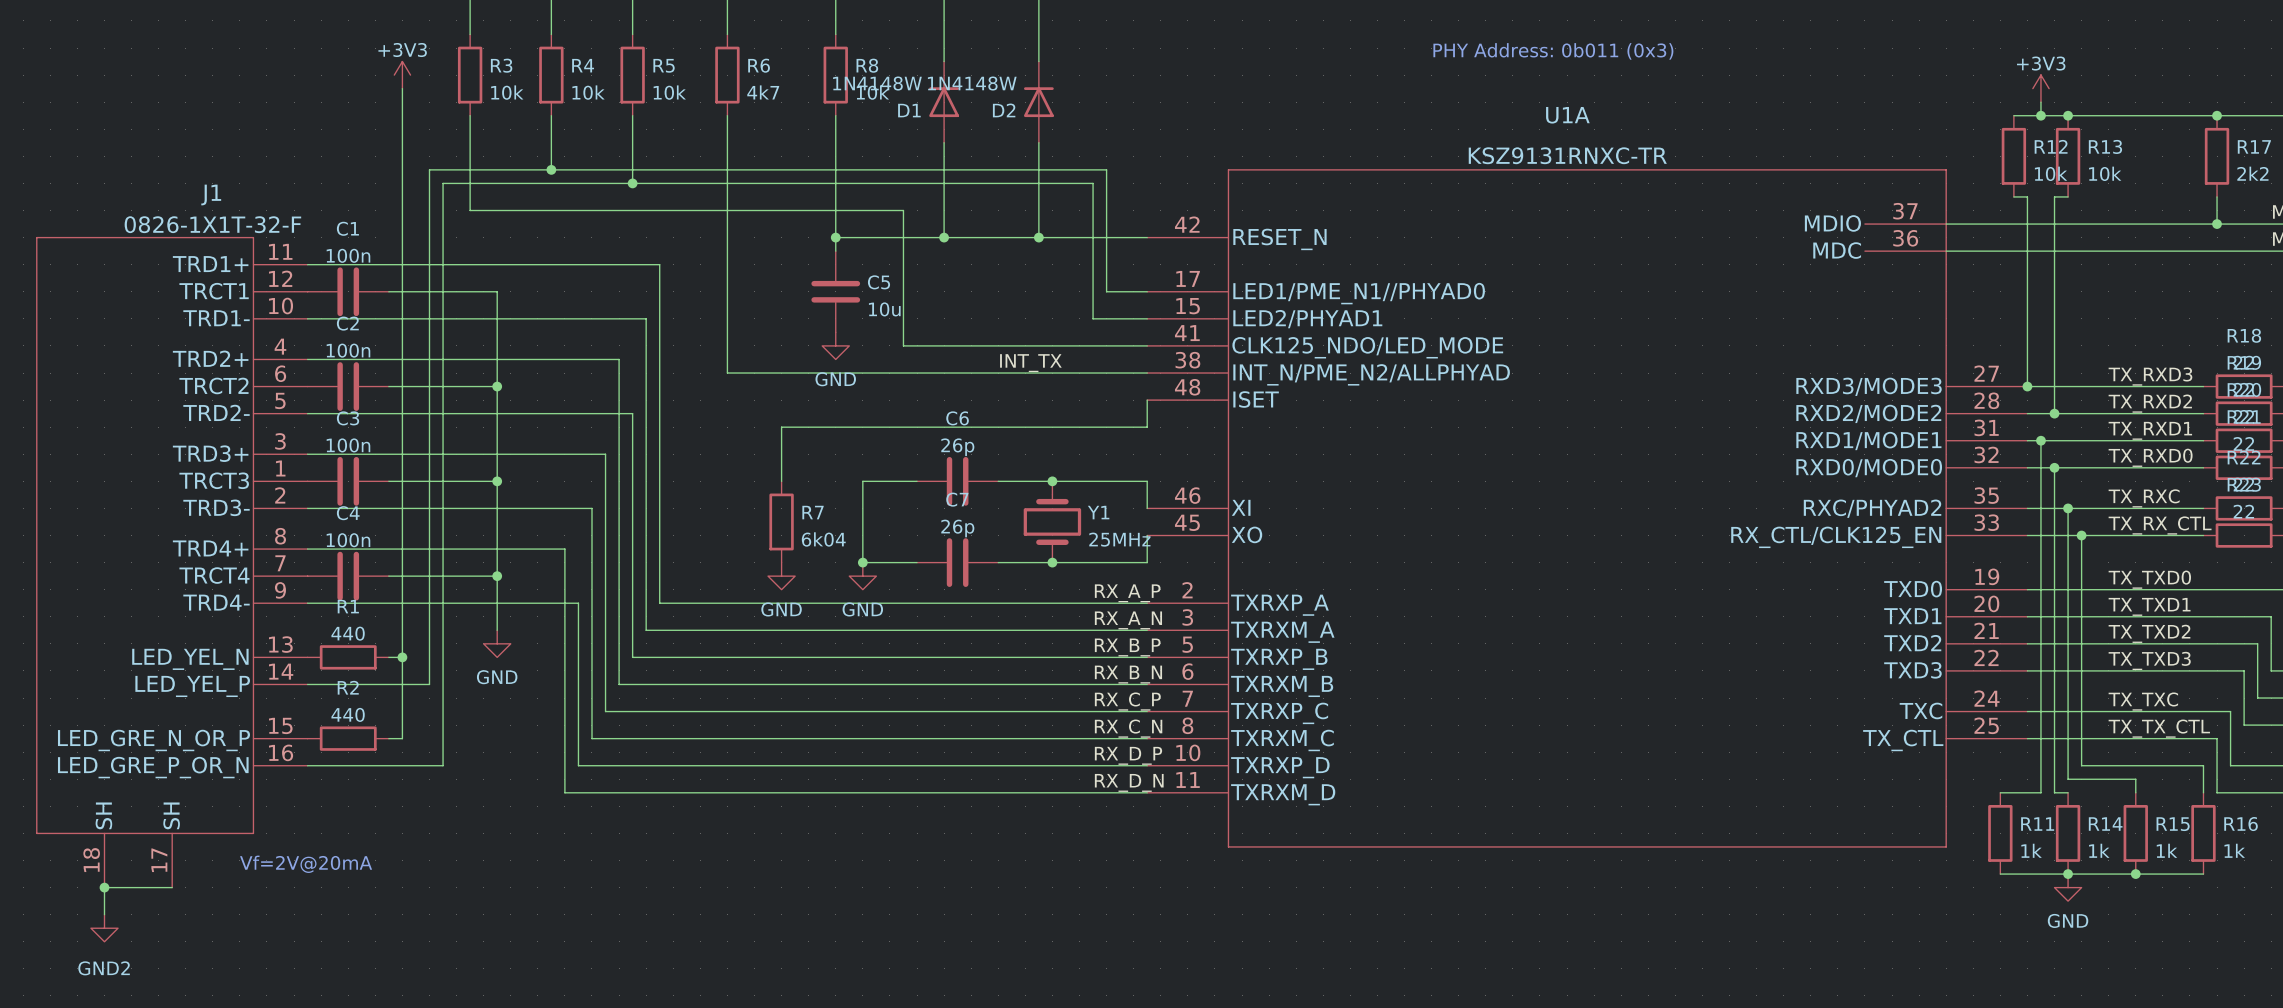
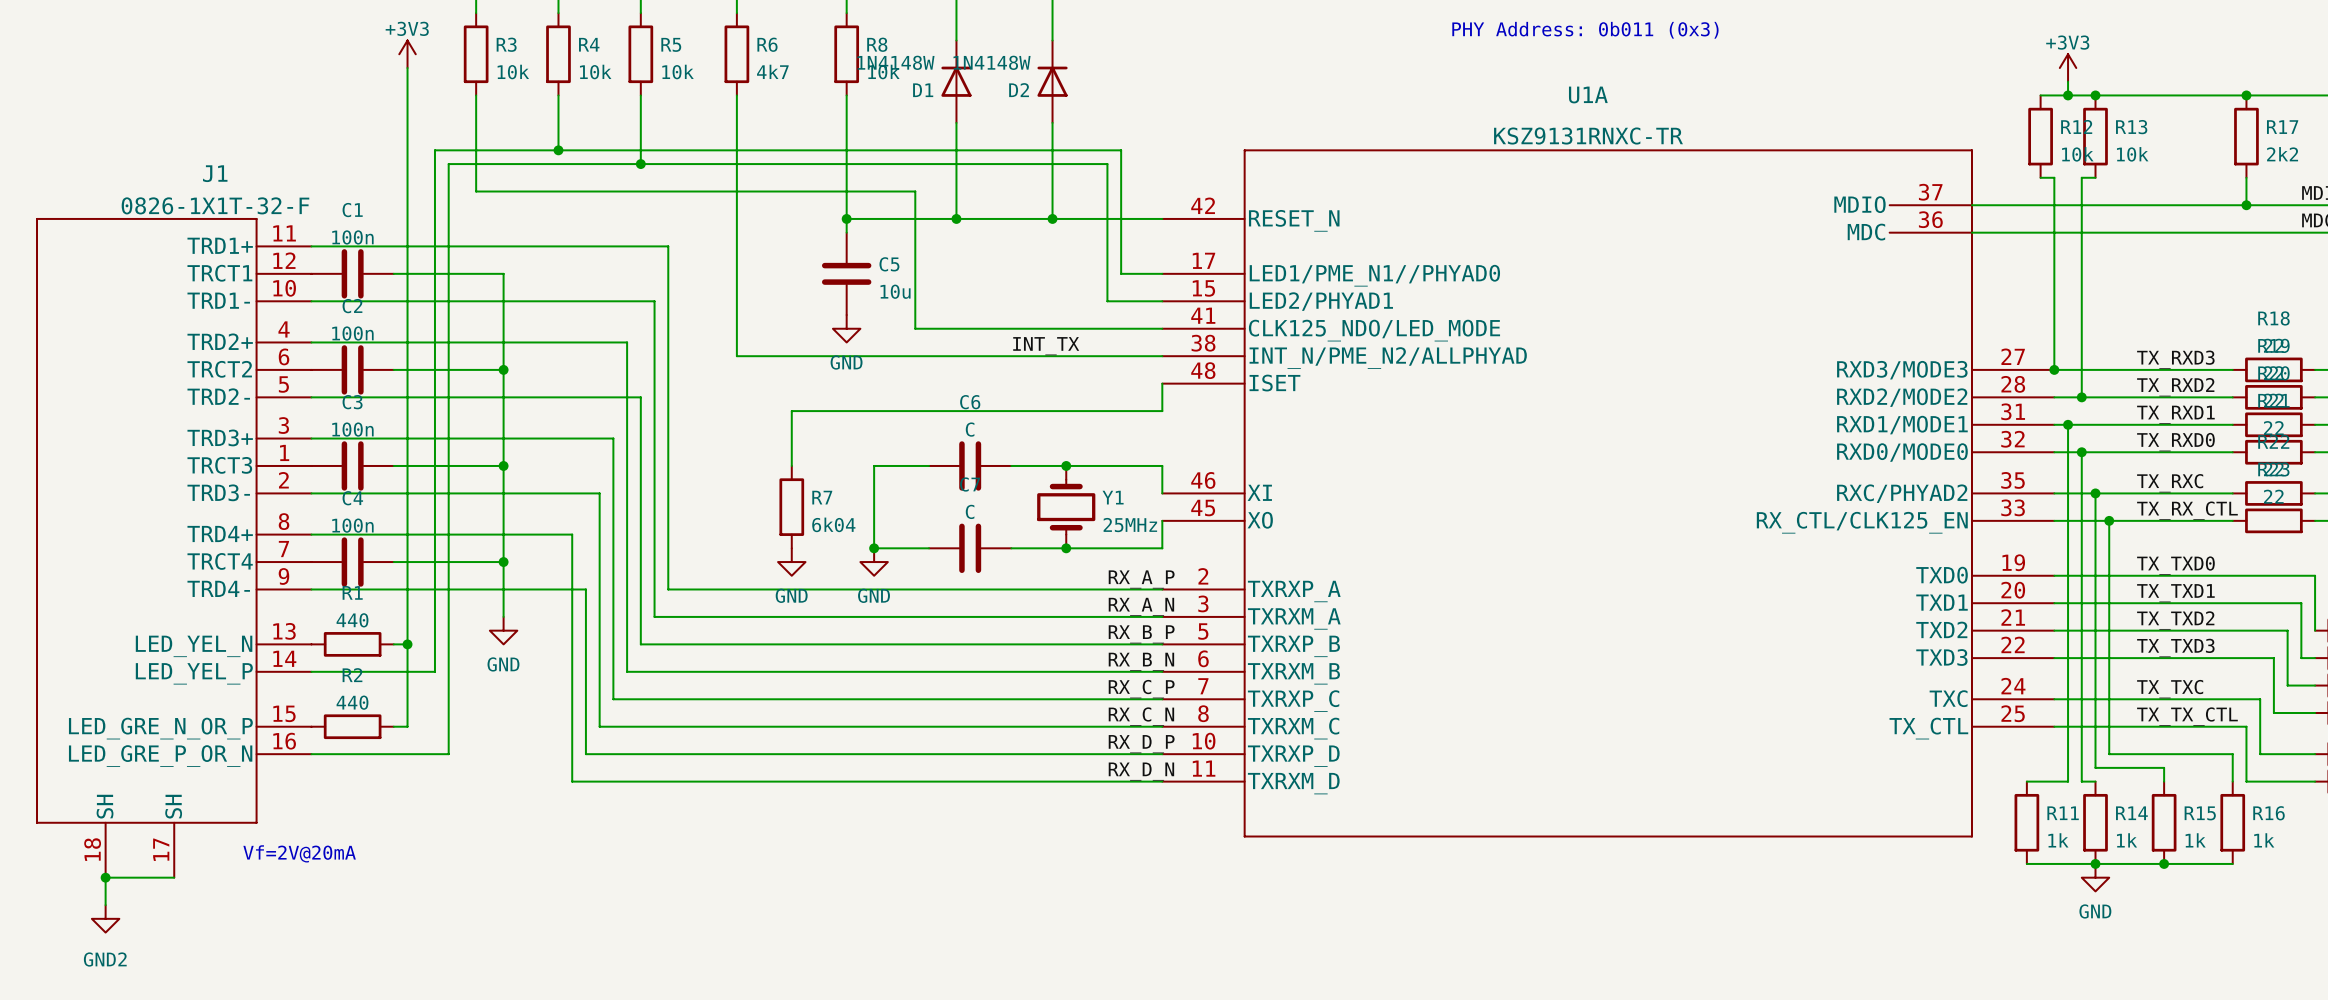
C6 value: 26p (957, 447) -> C (970, 429)
C7 value: 26p (957, 528) -> C (970, 511)

